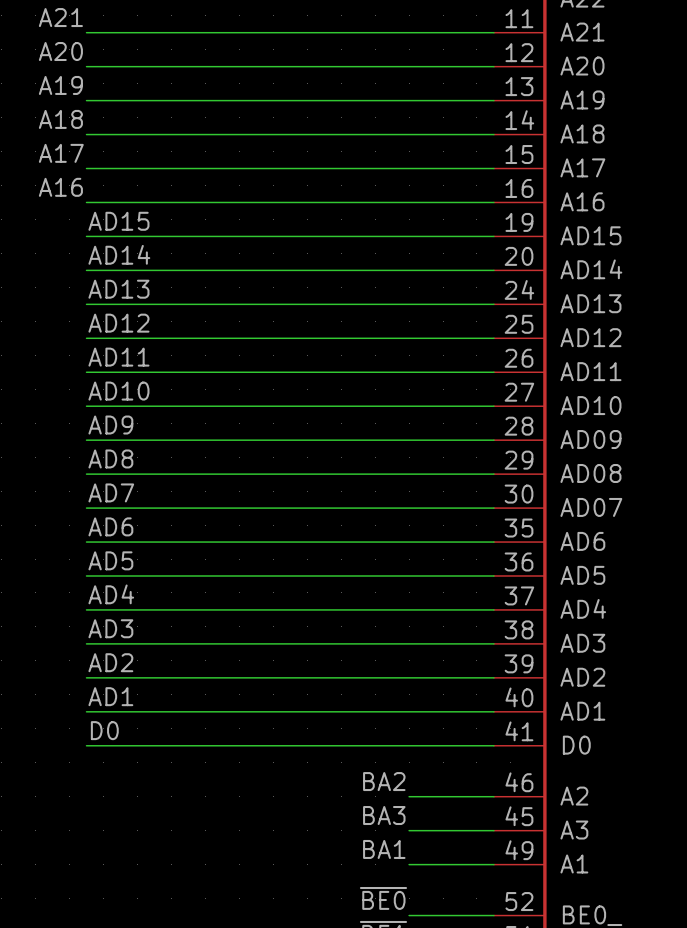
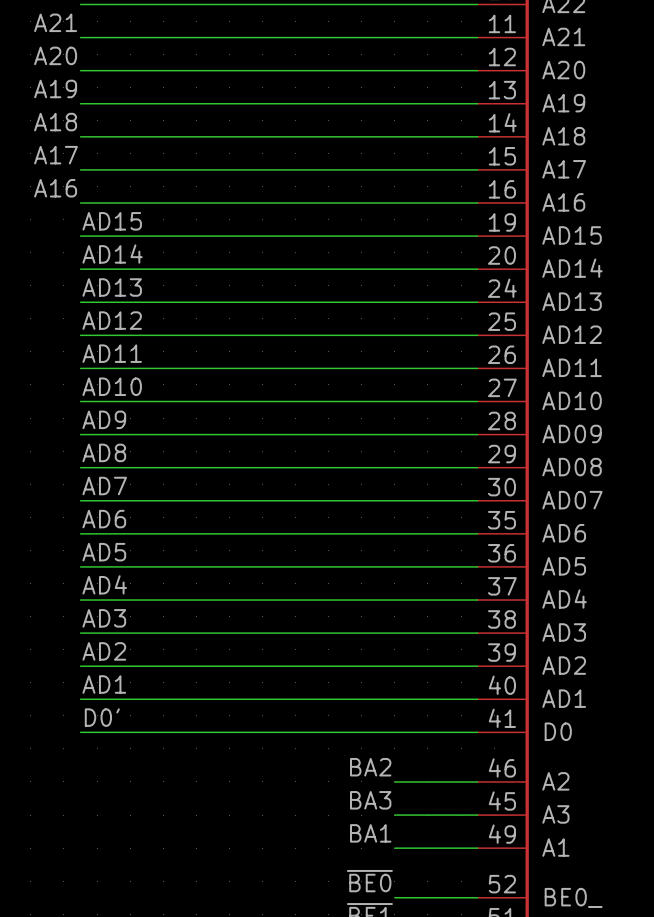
label: D0 (104, 730) -> D0' (102, 717)

